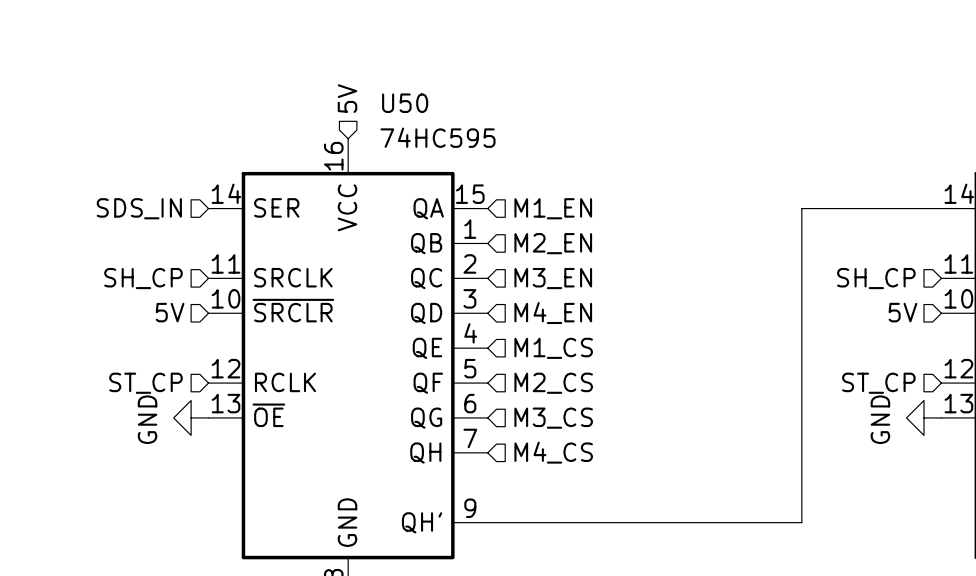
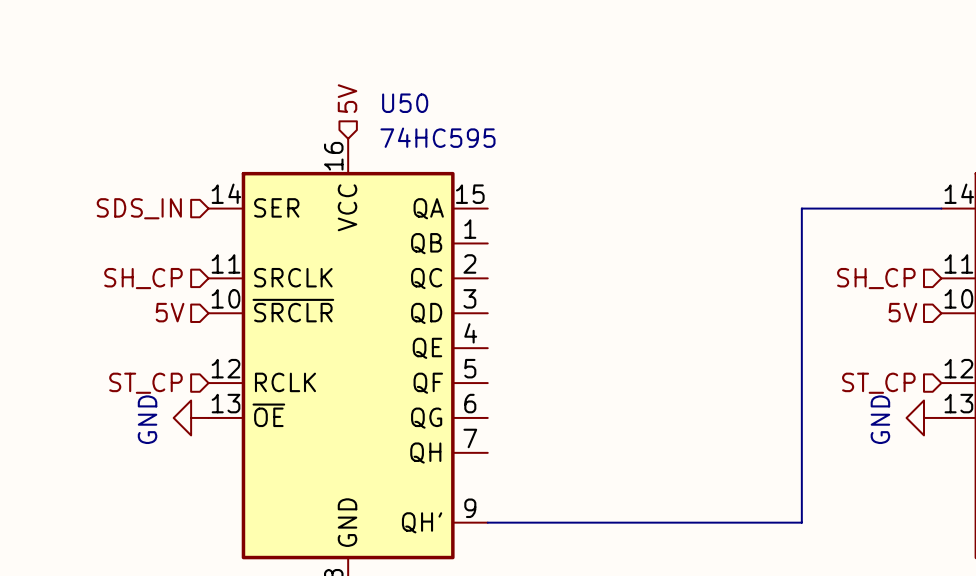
hierarchical label: M1_EN (553, 208) -> none
hierarchical label: M2_EN (553, 243) -> none
hierarchical label: M3_EN (553, 278) -> none
hierarchical label: M4_EN (553, 313) -> none
hierarchical label: M1_CS (553, 348) -> none
hierarchical label: M2_CS (553, 383) -> none
hierarchical label: M3_CS (553, 418) -> none
hierarchical label: M4_CS (553, 452) -> none

